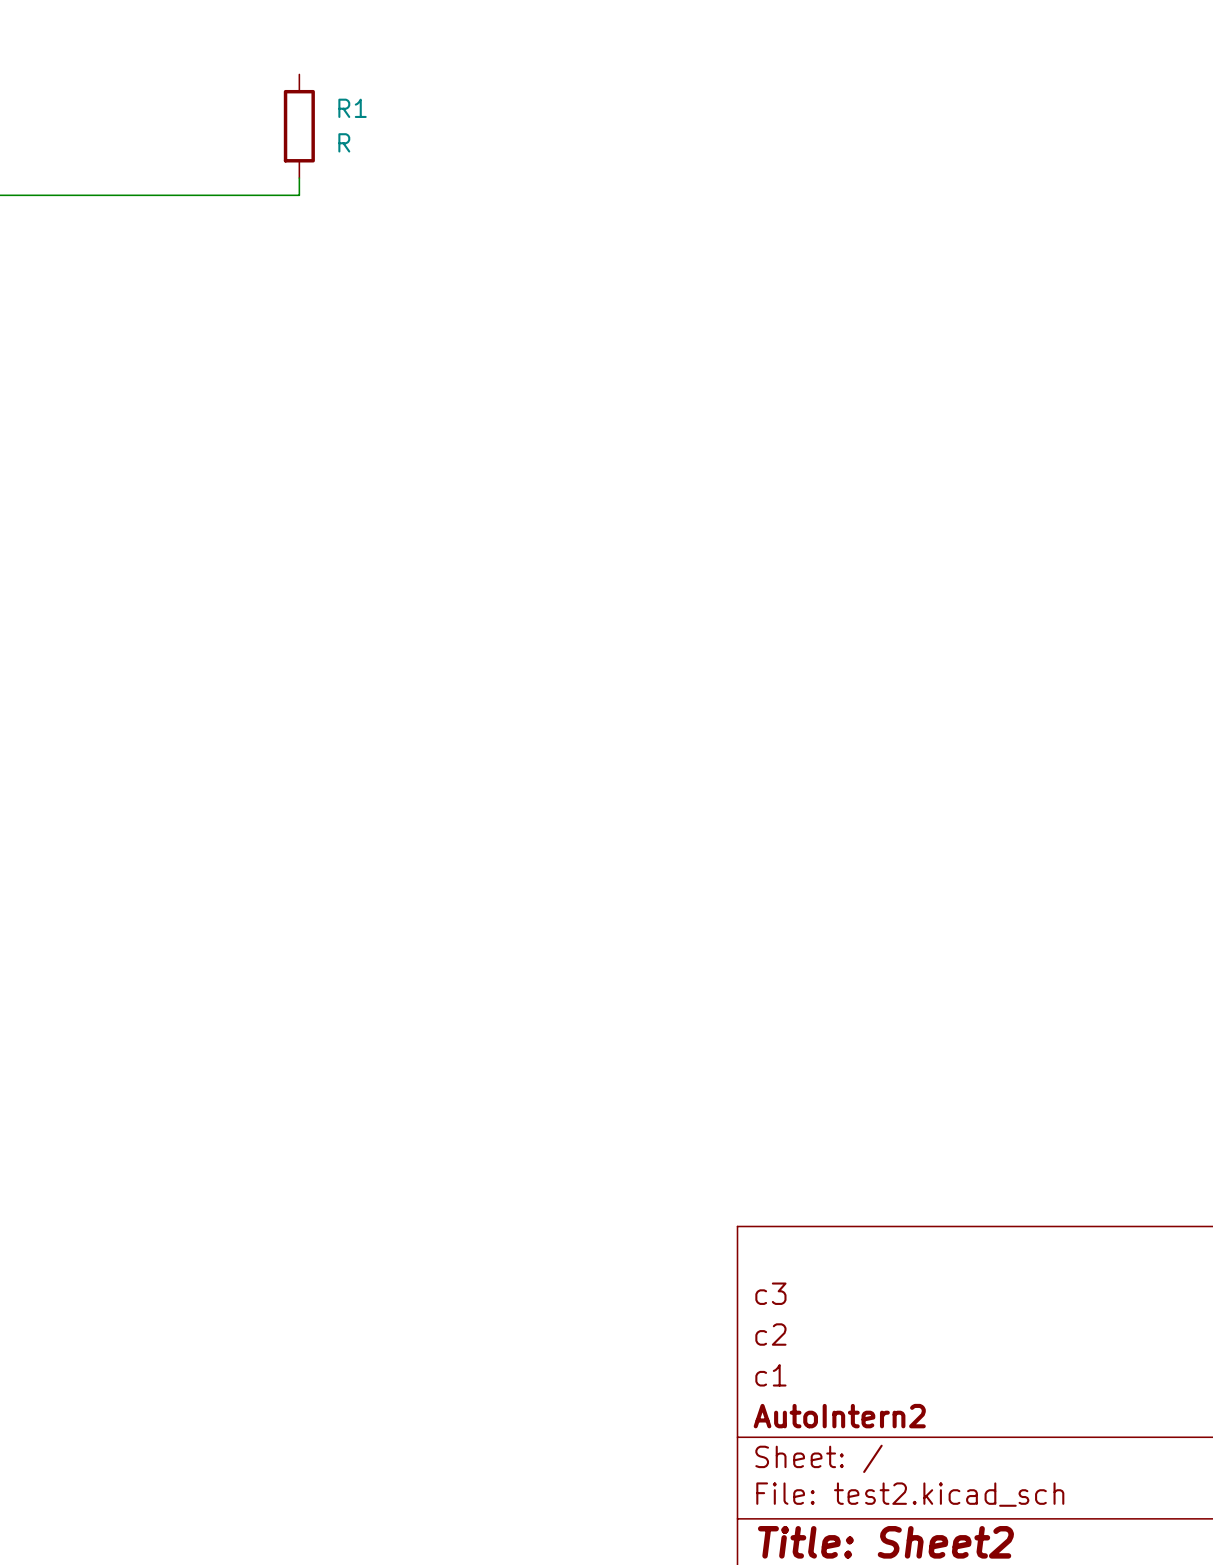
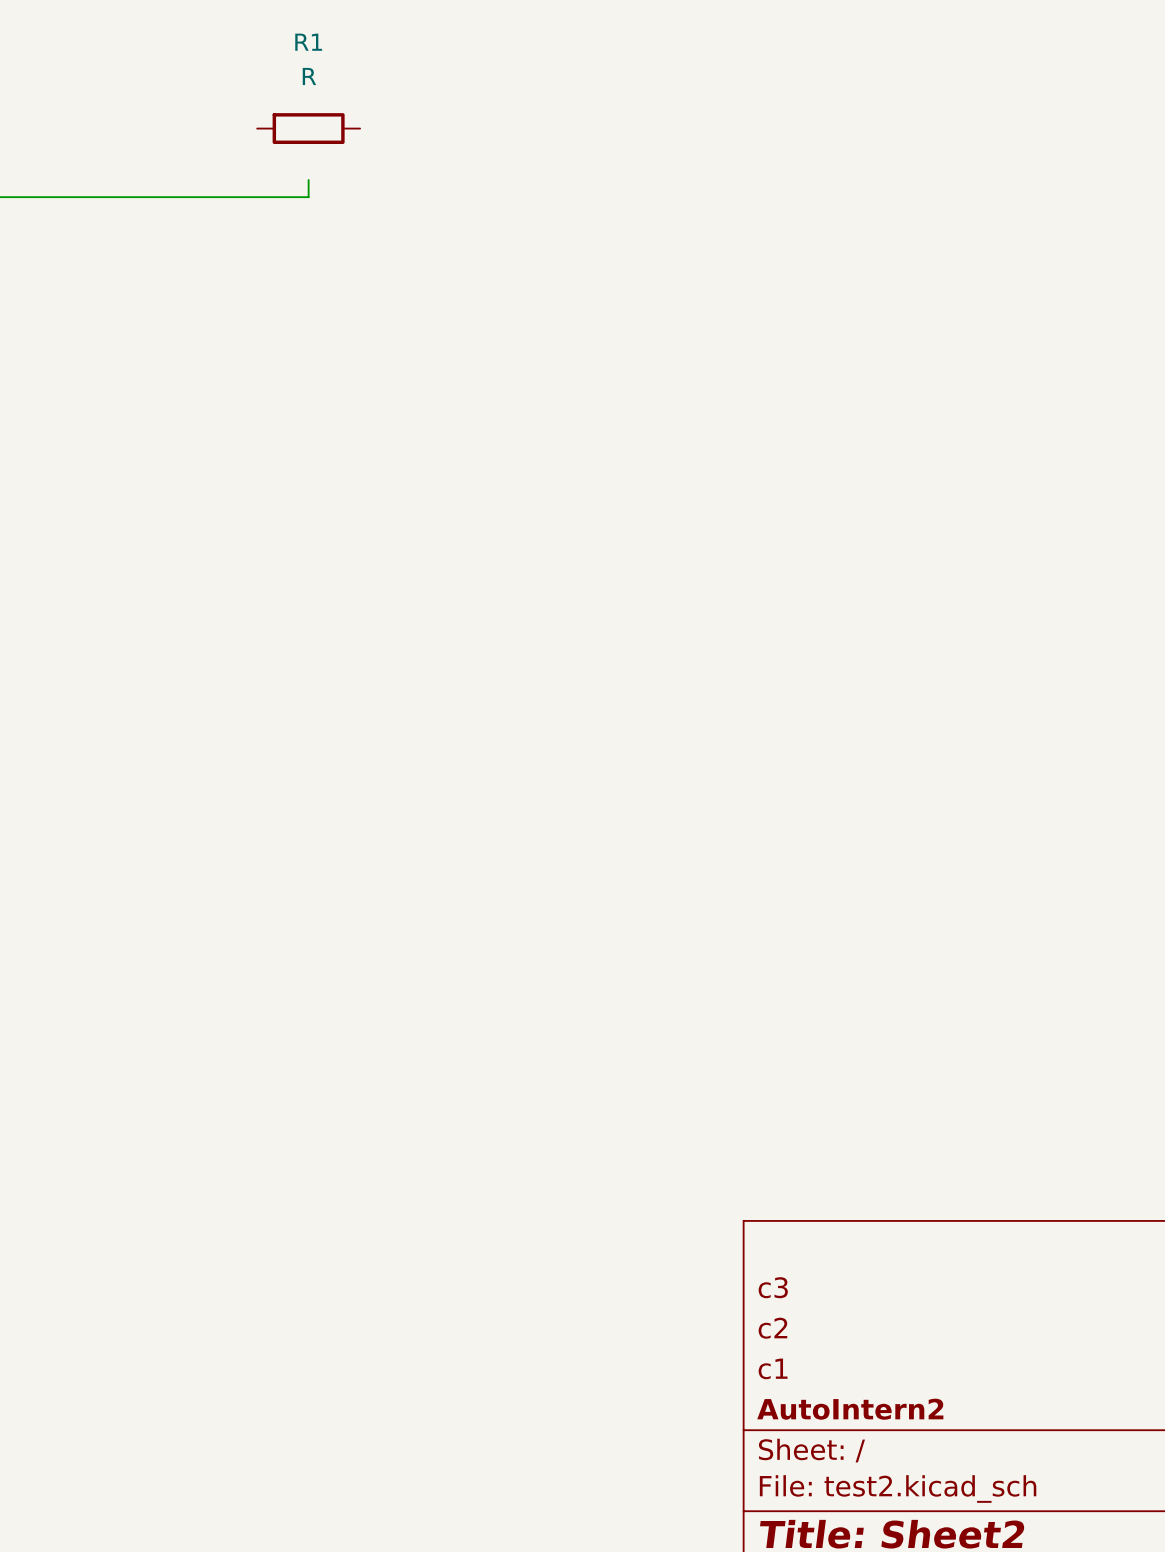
R1 name position: R1 (352, 108) -> R1 (308, 42)
R1 rotation: 0° (299, 126) -> 90° clockwise (308, 128)
R1 value position: R (344, 142) -> R (309, 76)

